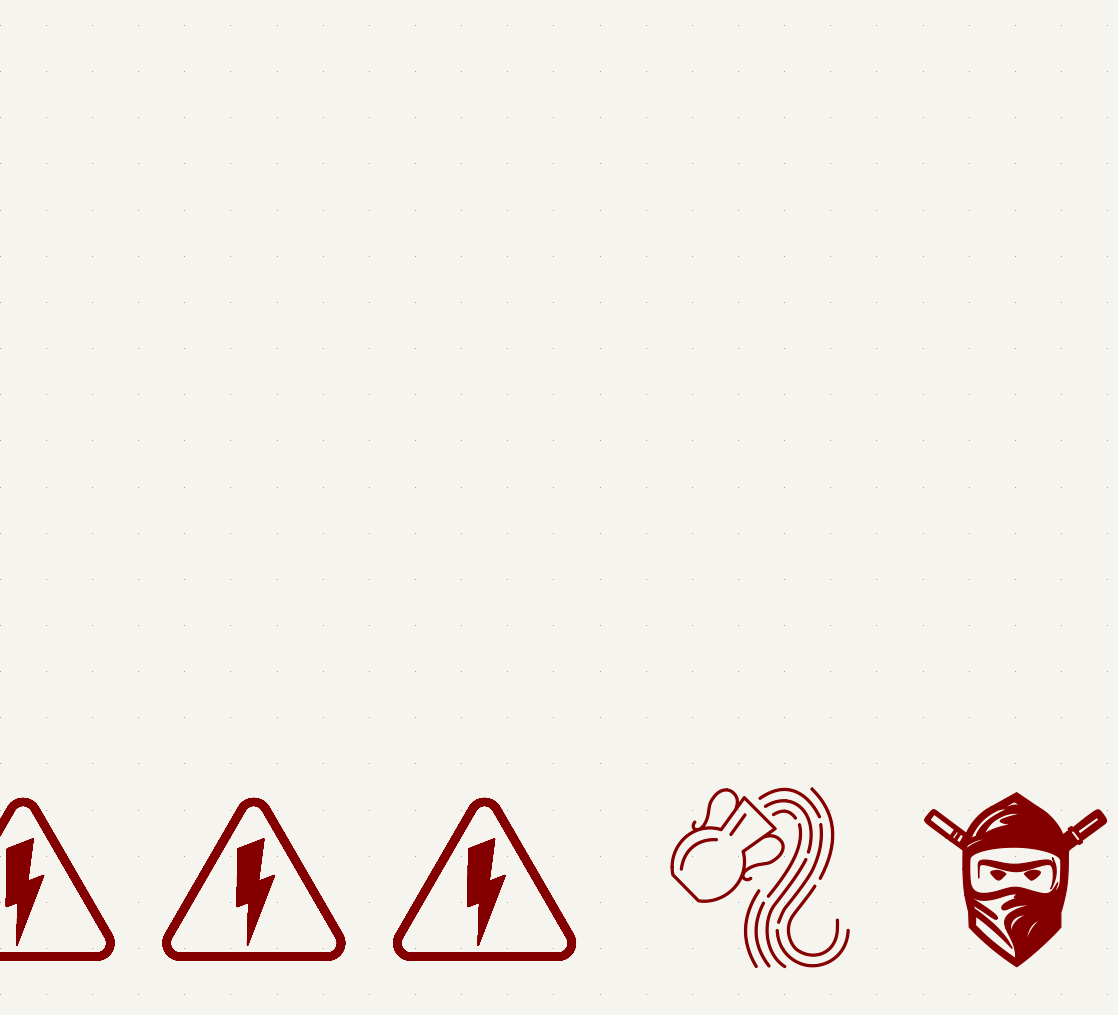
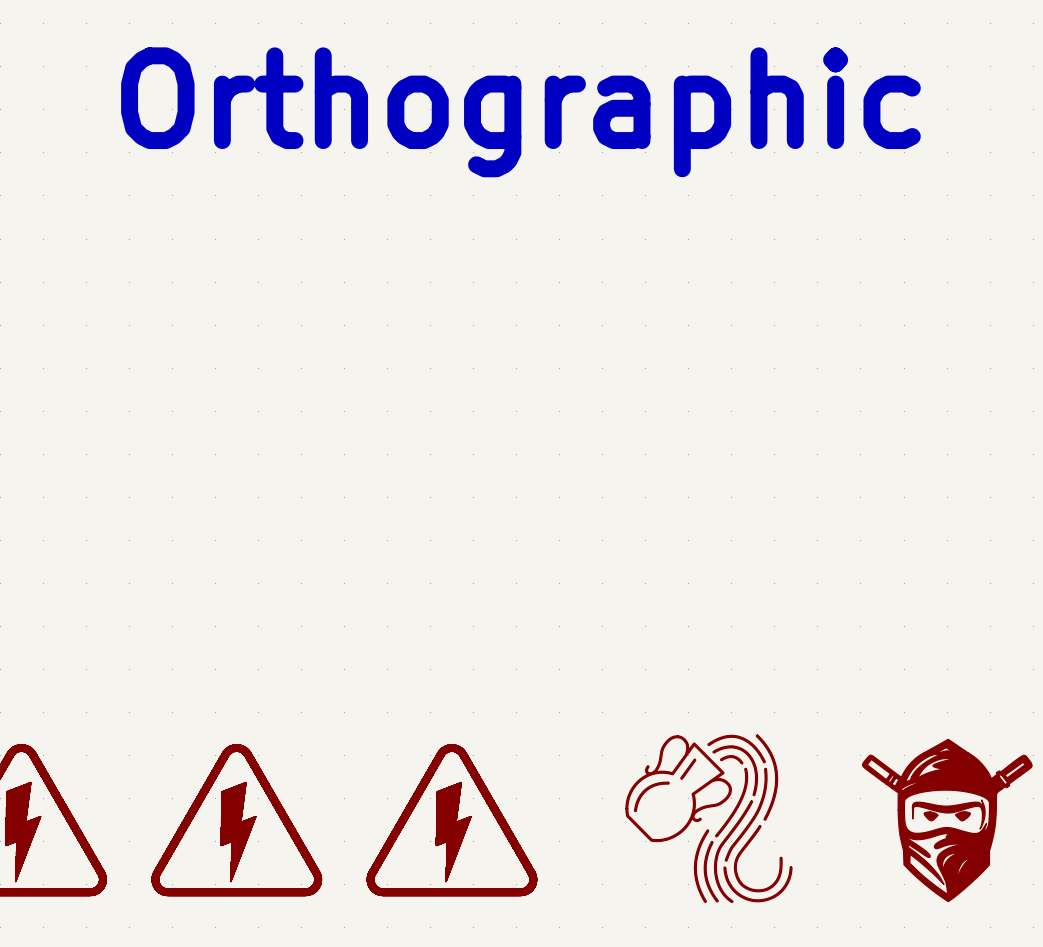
text: none -> Orthographic (520, 112)

